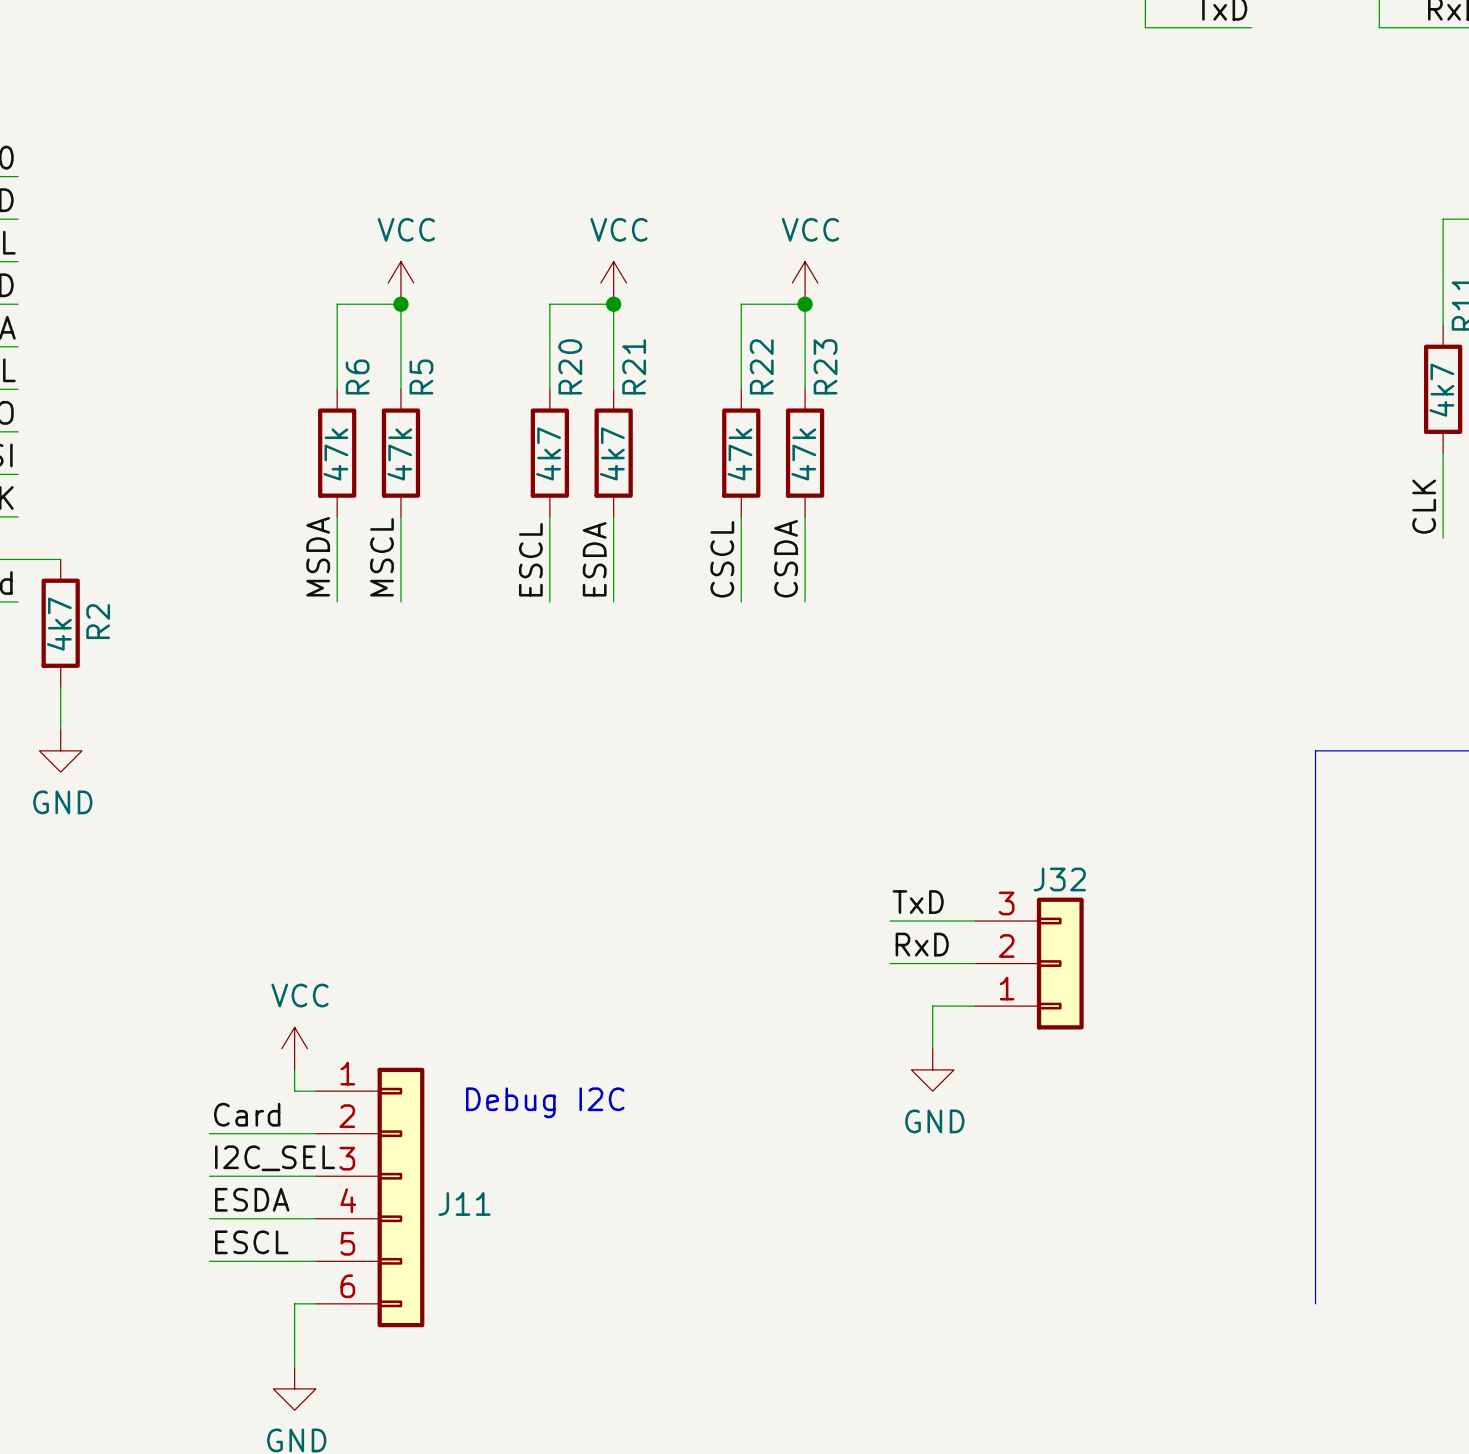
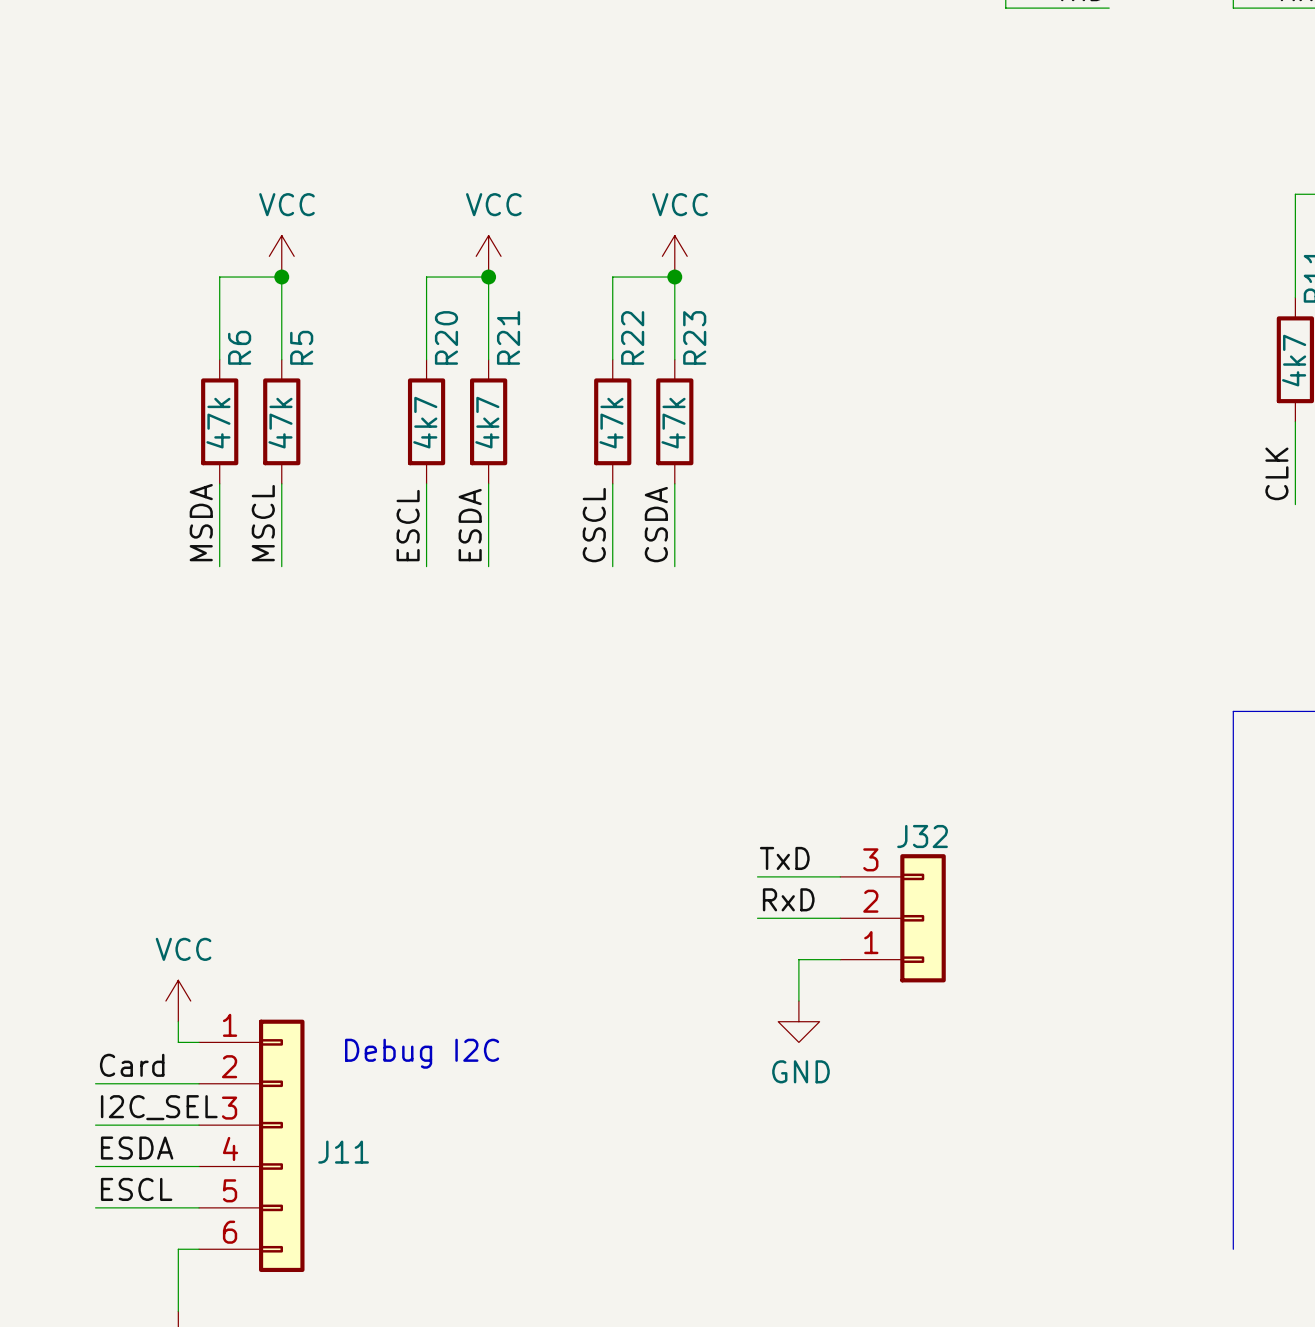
line: (1379, 750) (1315, 750) (1315, 1303) -> (1233, 711) (1233, 1249)

